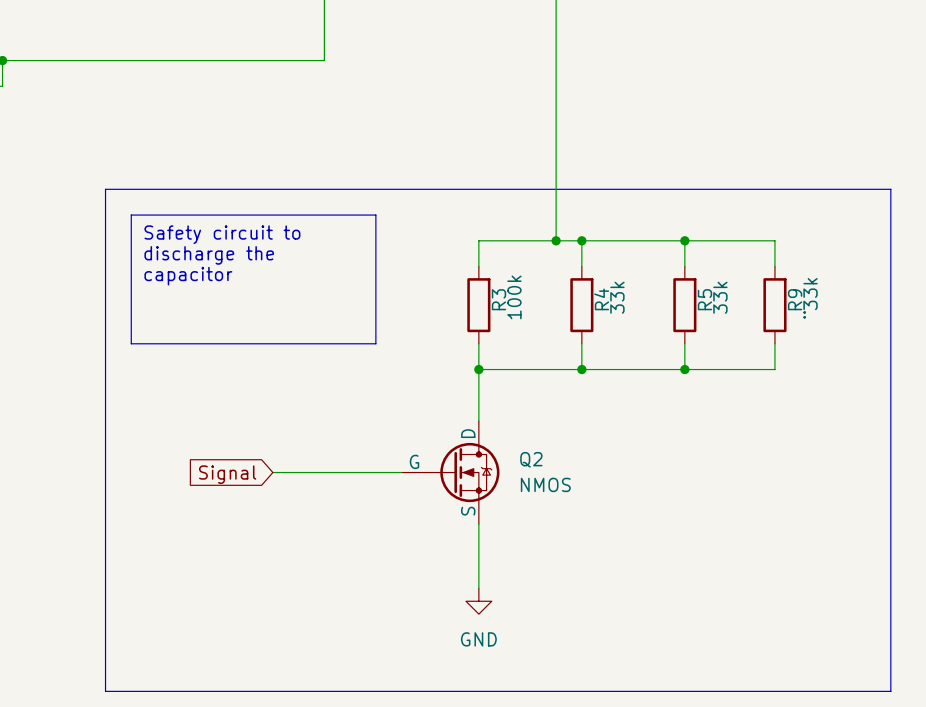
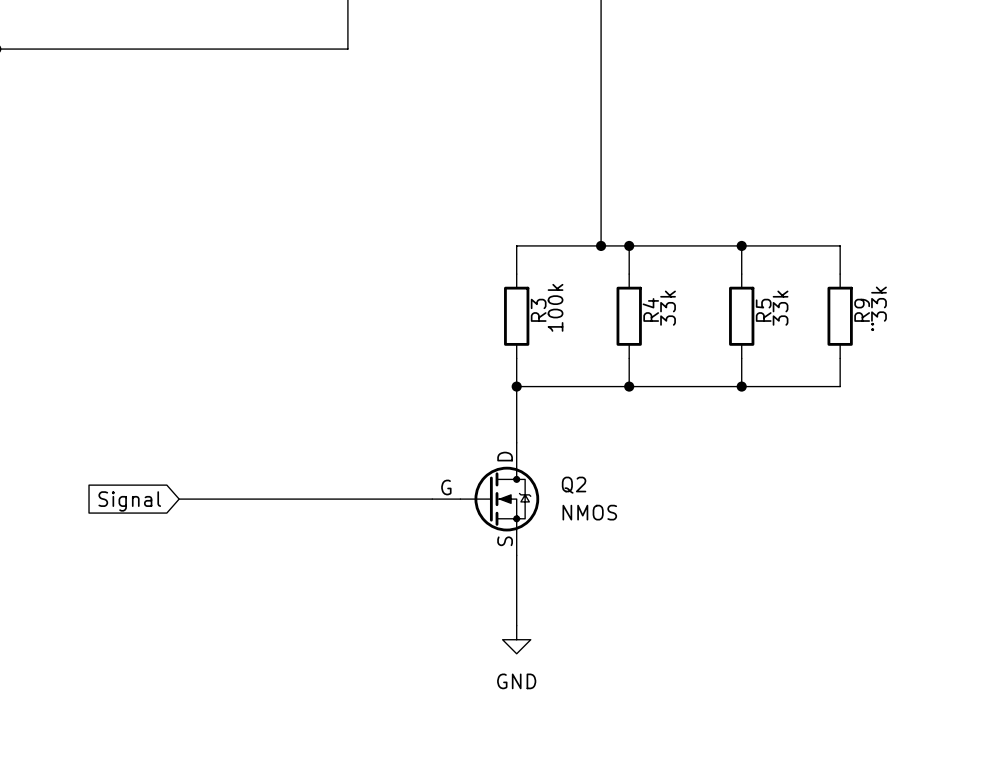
line: (105, 189) (890, 189) (890, 691) (105, 691) (105, 189) -> none
line: (131, 215) (375, 215) (375, 343) (131, 343) (131, 215) -> none
text: Safety circuit to (222, 234) -> none
text: discharge the (209, 255) -> none
text: capacitor (188, 276) -> none
wire: none -> (179, 499) (291, 499)
global label position: Signal (227, 474) -> Signal (129, 501)

